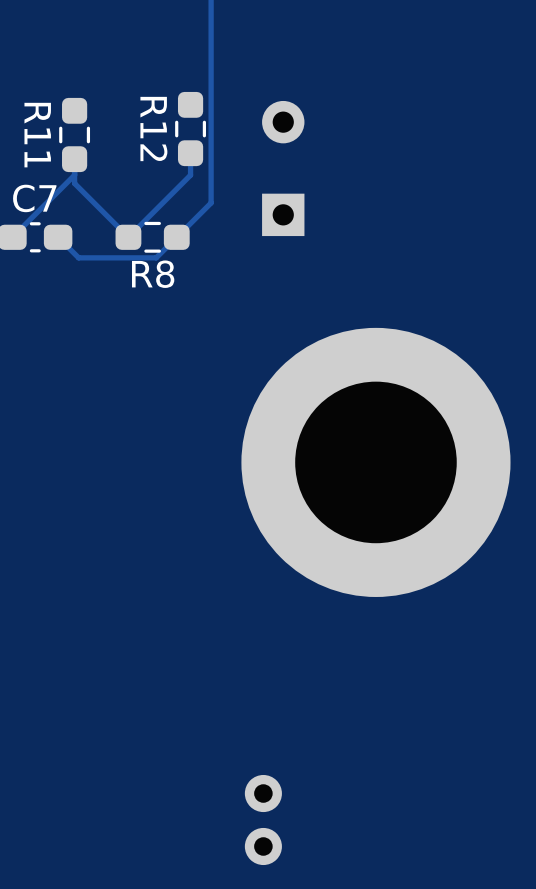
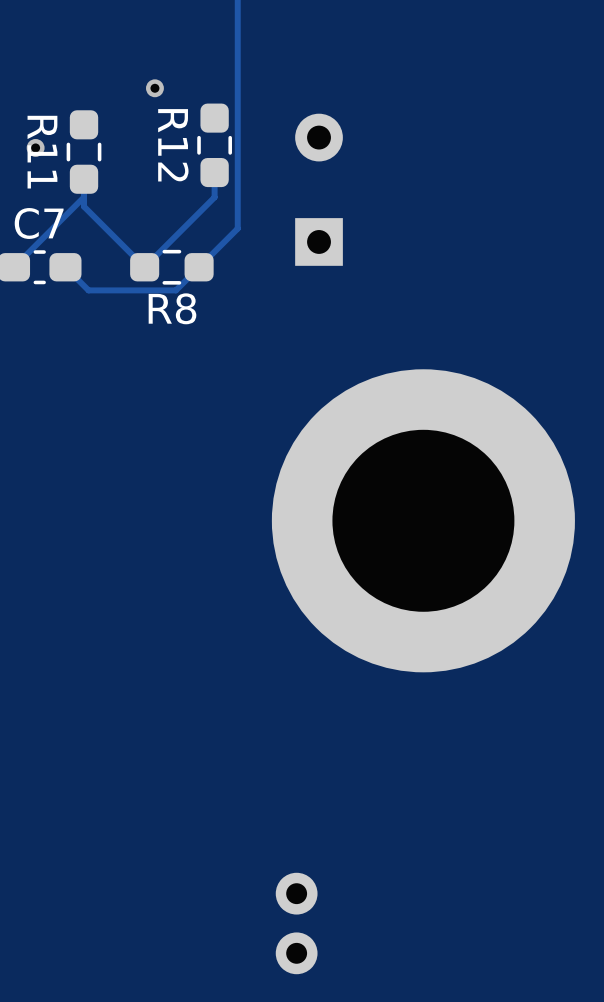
via: none -> (154, 88)
via: none -> (35, 147)

